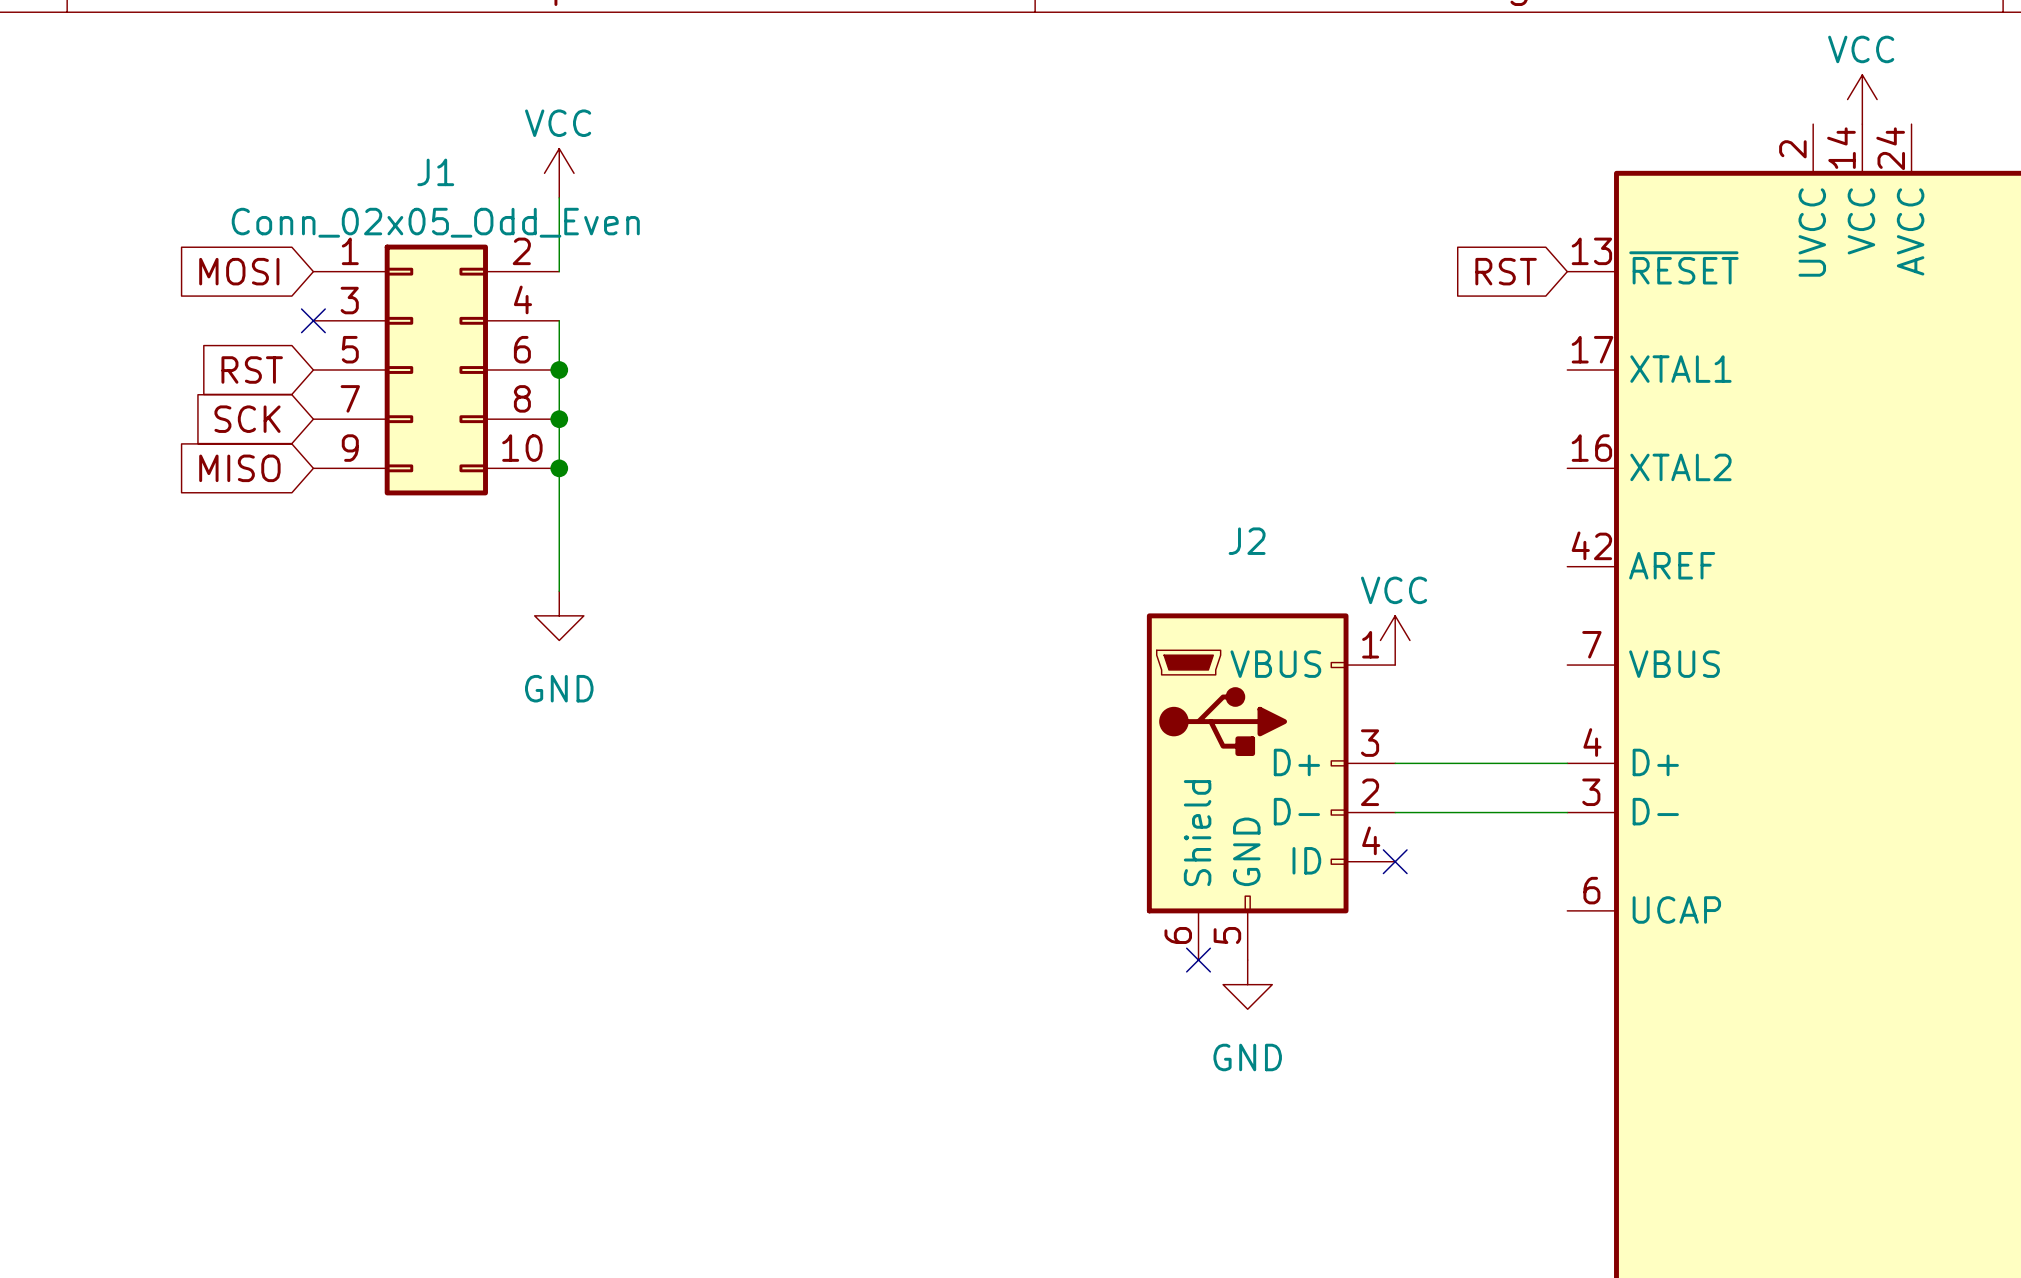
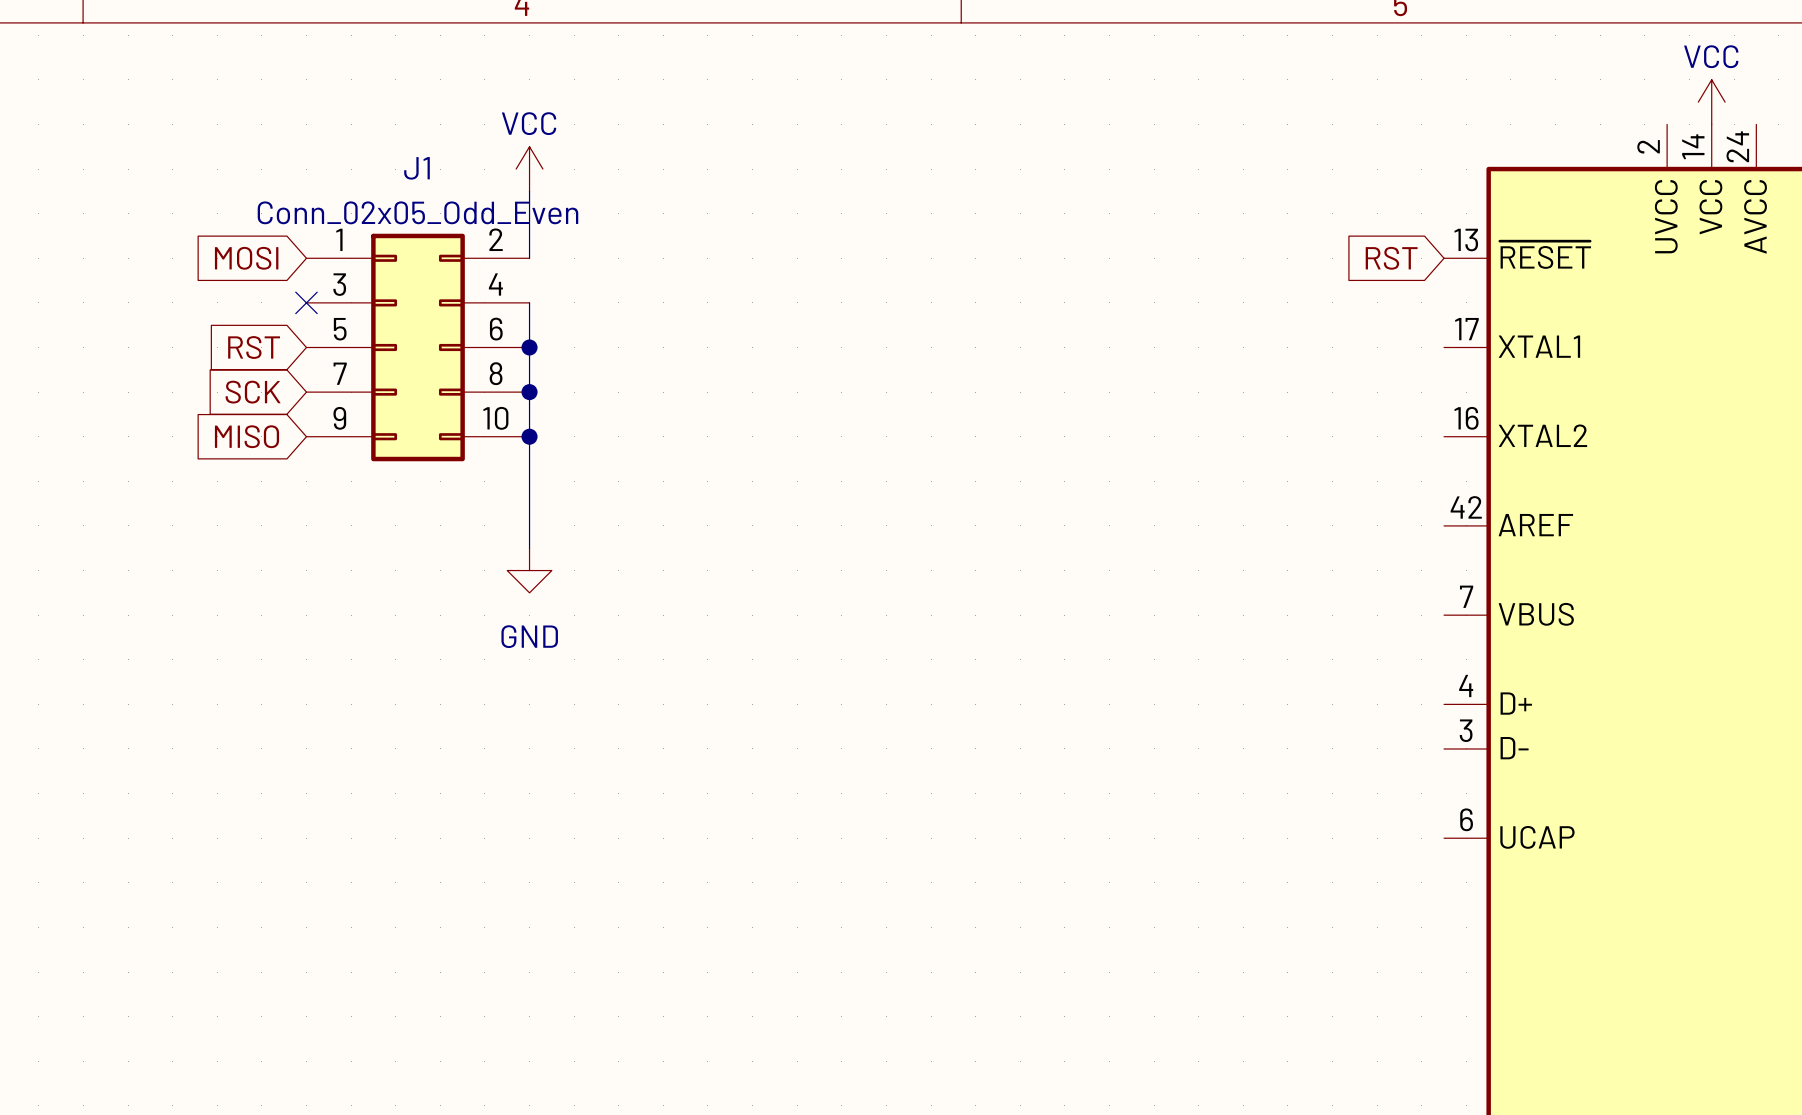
power symbol: VCC (1395, 640) -> none
wire: (1395, 763) (1567, 763) -> none
J2: (1271, 786) -> none
wire: (1395, 812) (1567, 812) -> none
no-connect mark: (1395, 861) -> none
no-connect mark: (1198, 960) -> none
power symbol: GND (1247, 984) -> none

